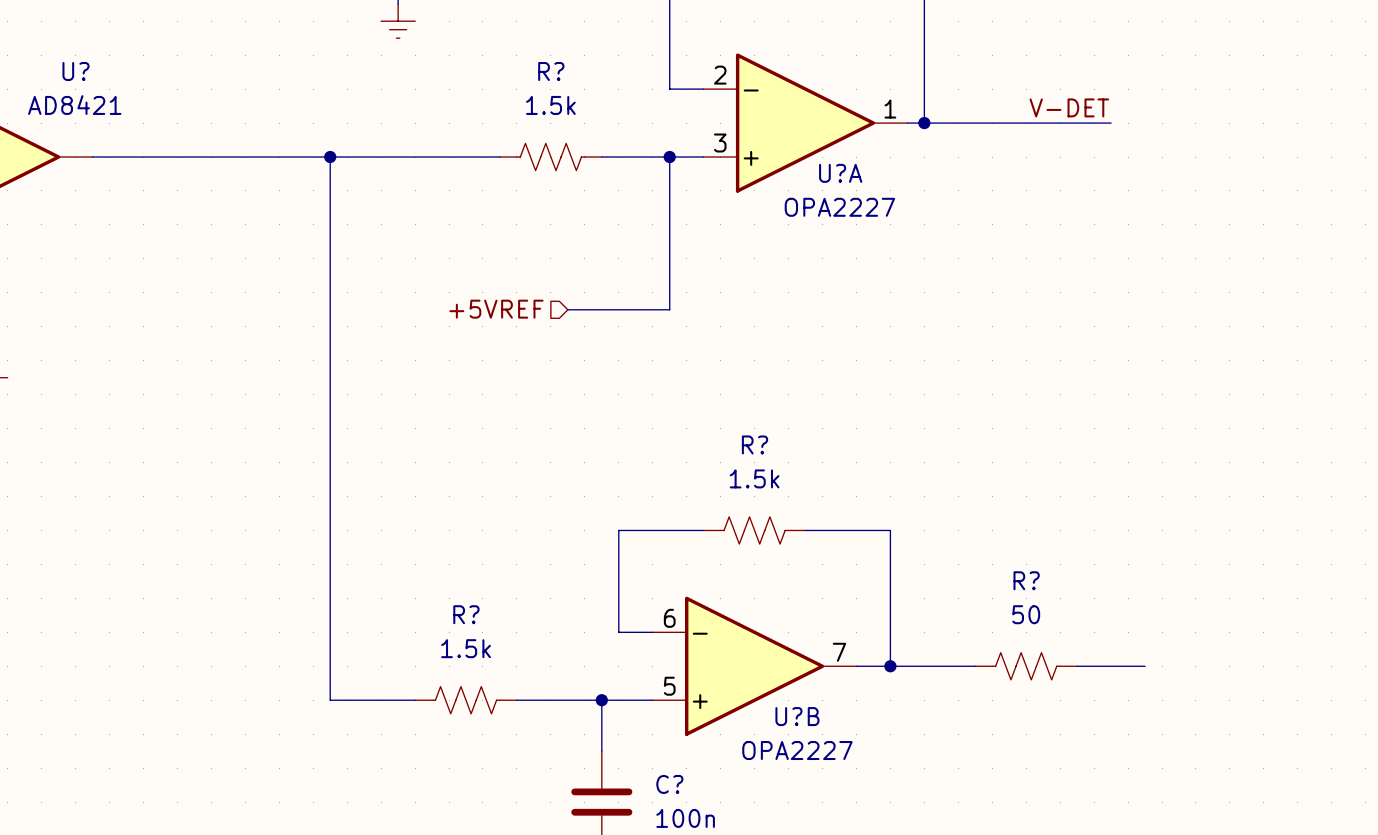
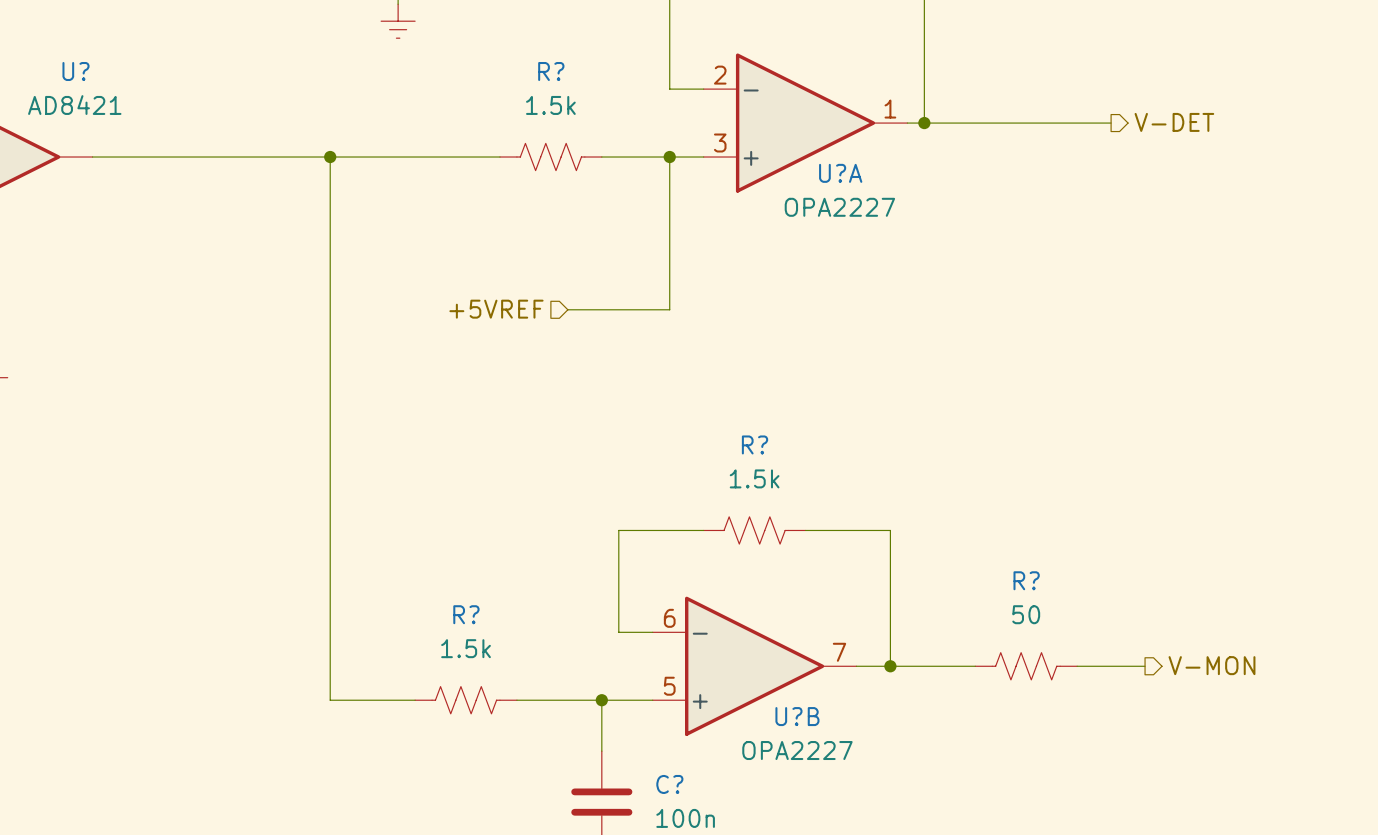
label: V-DET (1069, 107) -> none
hierarchical label: none -> V-DET (1174, 122)
hierarchical label: none -> V-MON (1211, 665)

